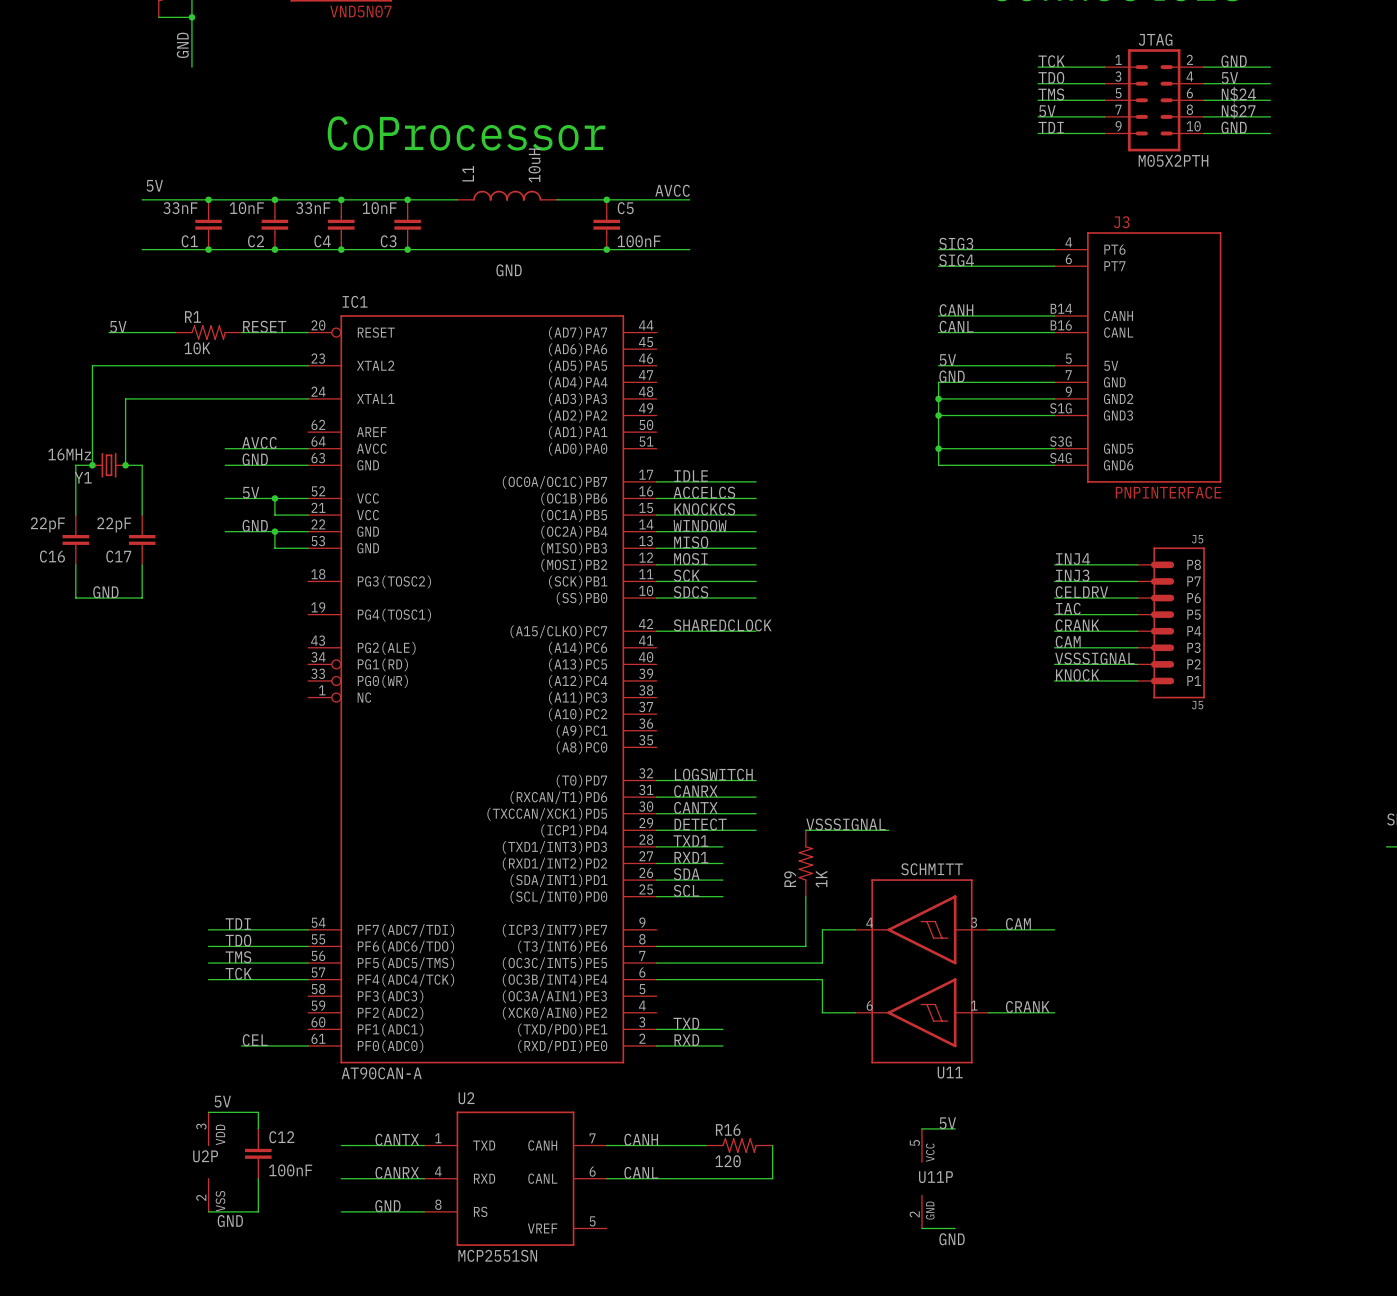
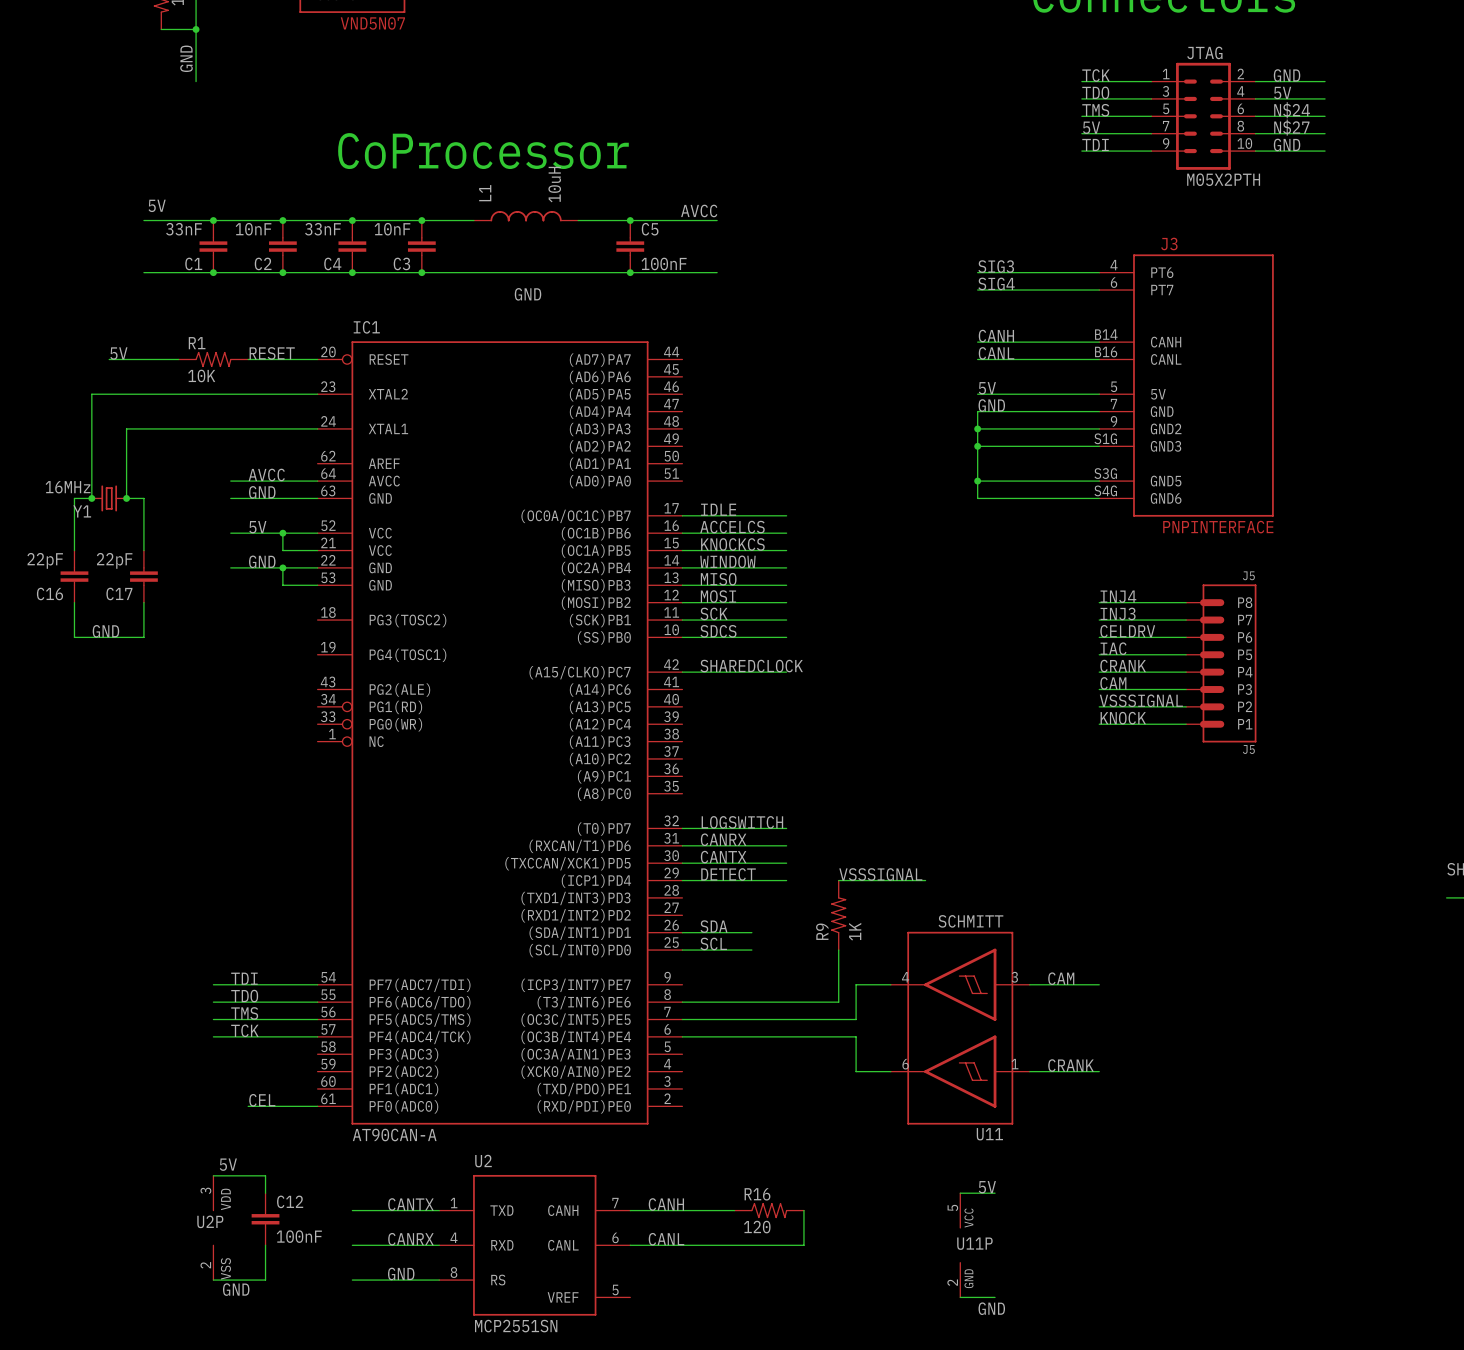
label: TXD1 (690, 841) -> none
wire: (656, 846) (722, 846) -> none
label: RXD1 (691, 857) -> none
wire: (656, 863) (722, 863) -> none
label: TXD (686, 1023) -> none
wire: (656, 1029) (722, 1029) -> none
label: RXD (686, 1040) -> none
wire: (656, 1045) (722, 1045) -> none

